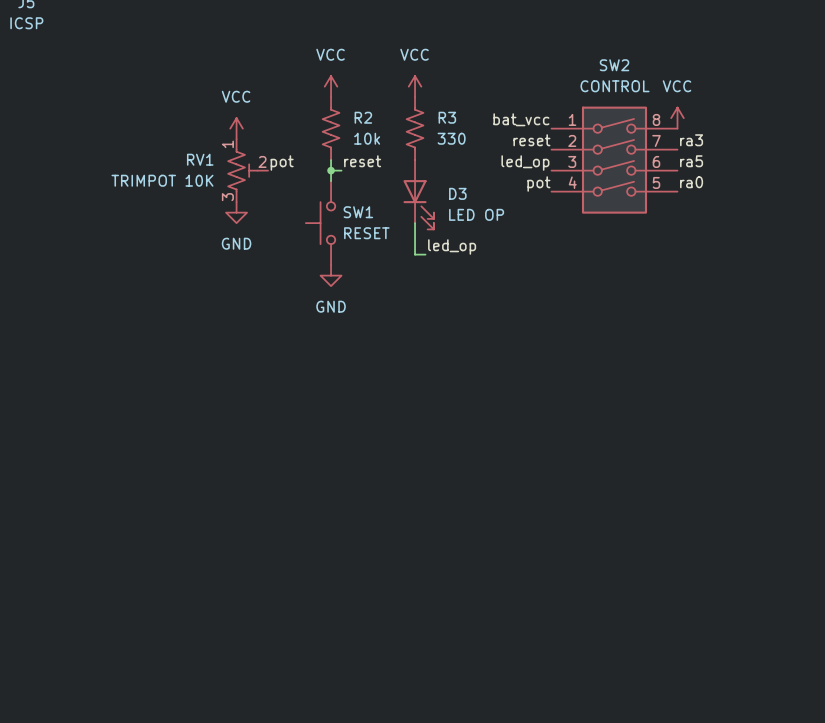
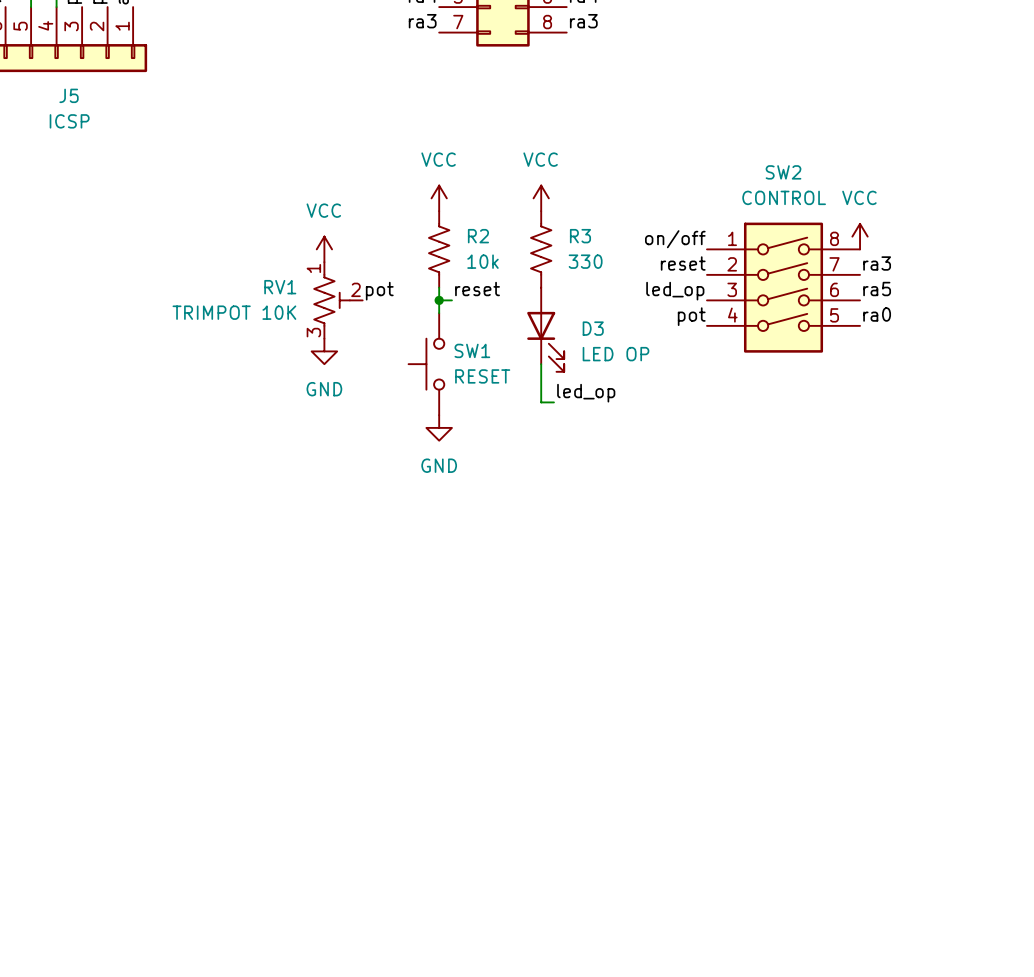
label: bat_vcc (521, 119) -> on/off (675, 239)

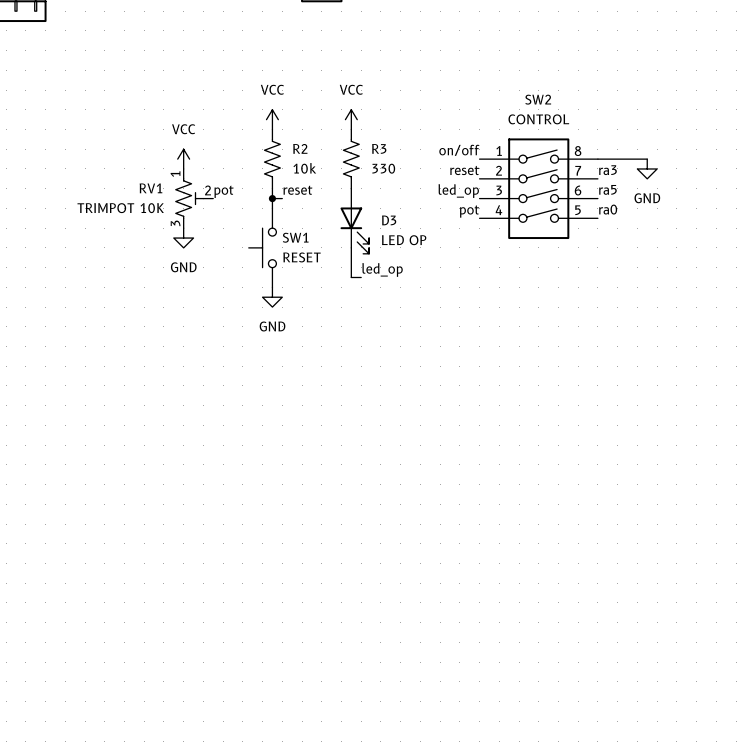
power symbol: VCC (860, 236) -> none
wire: none -> (597, 159) (647, 159)
power symbol: none -> GND (647, 168)

